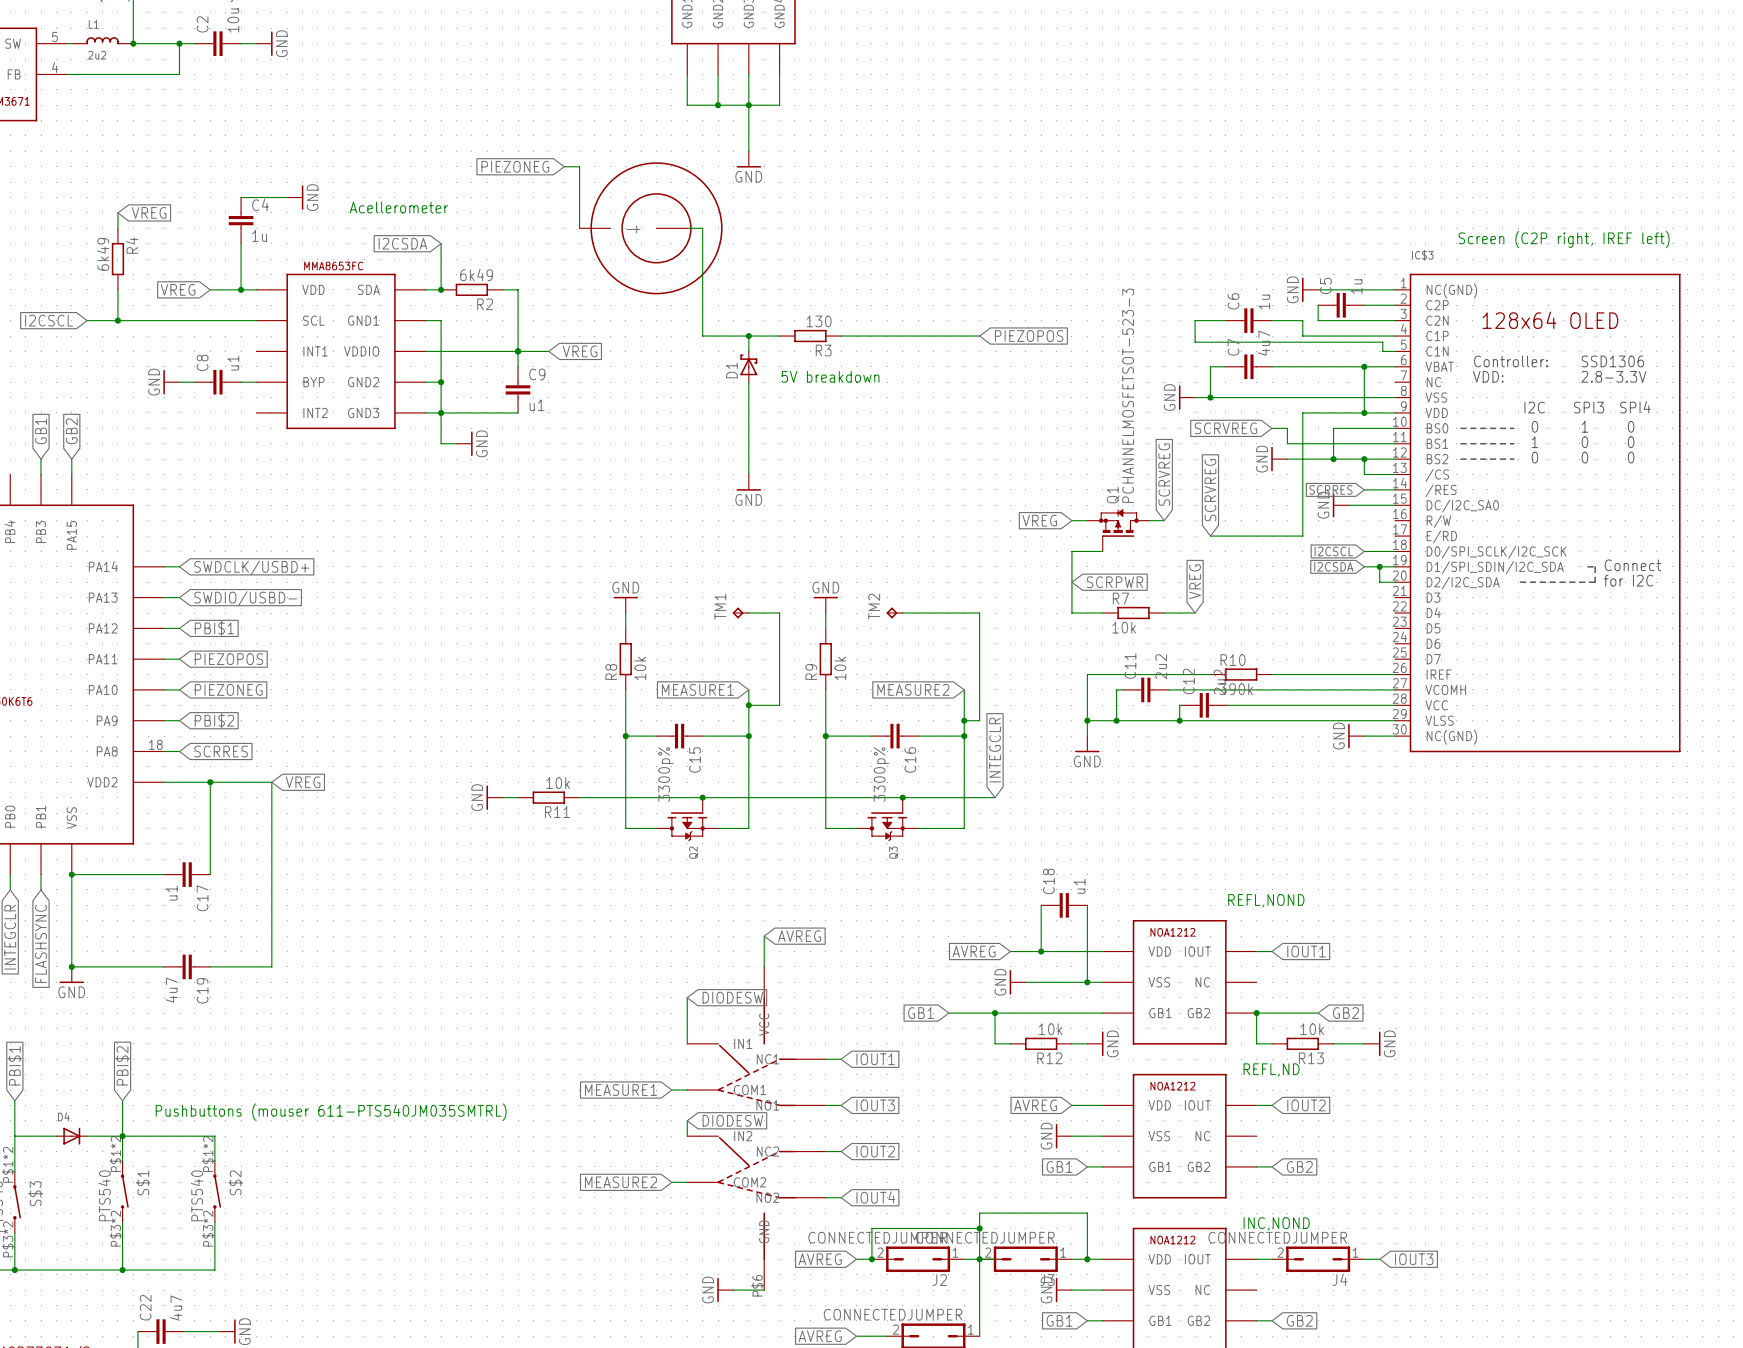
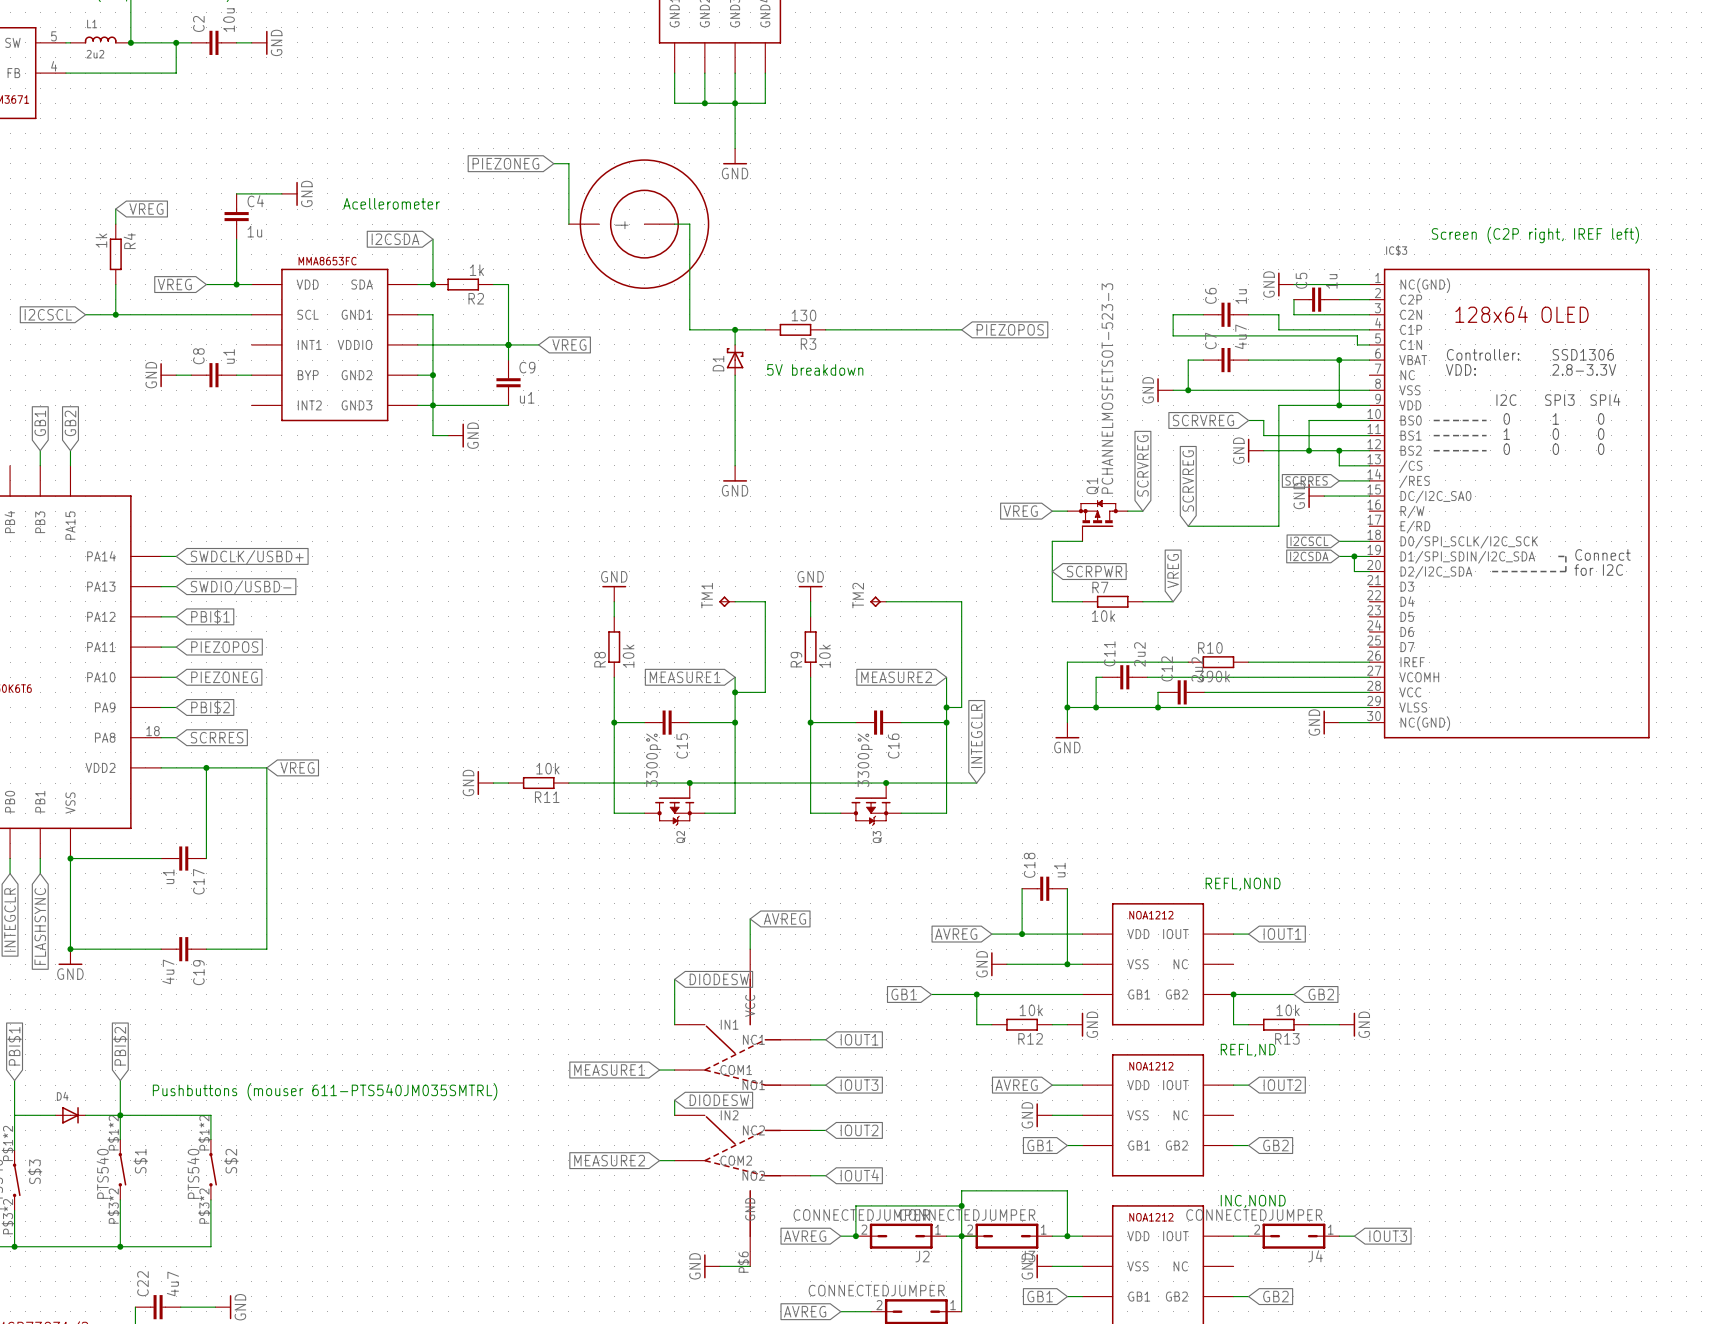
R4 value: 6k49 (103, 254) -> 1k (101, 240)
R2 value: 6k49 (476, 274) -> 1k (476, 270)

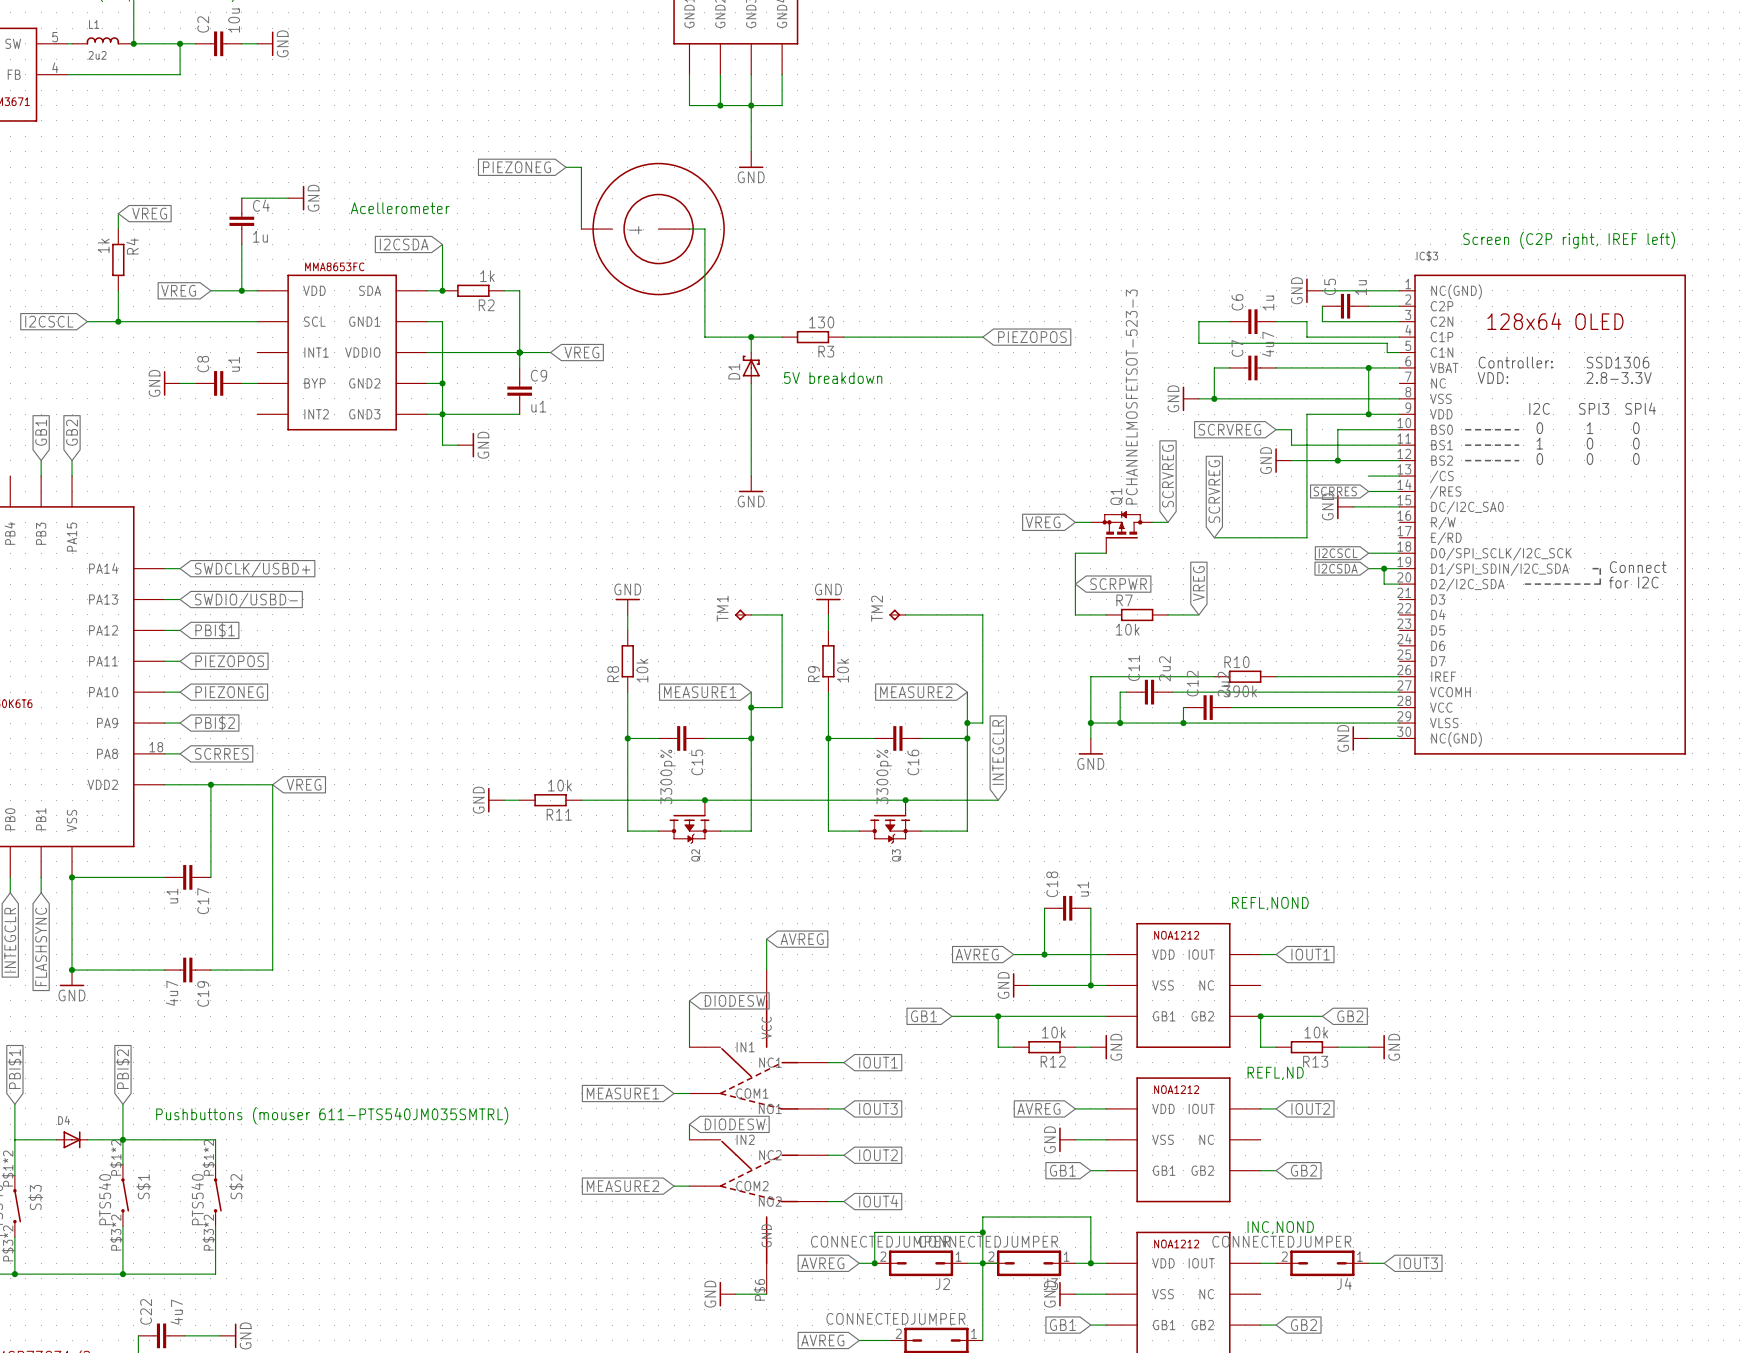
wire: (1339, 450) (1339, 465) -> none
junction: (1339, 450) -> none

